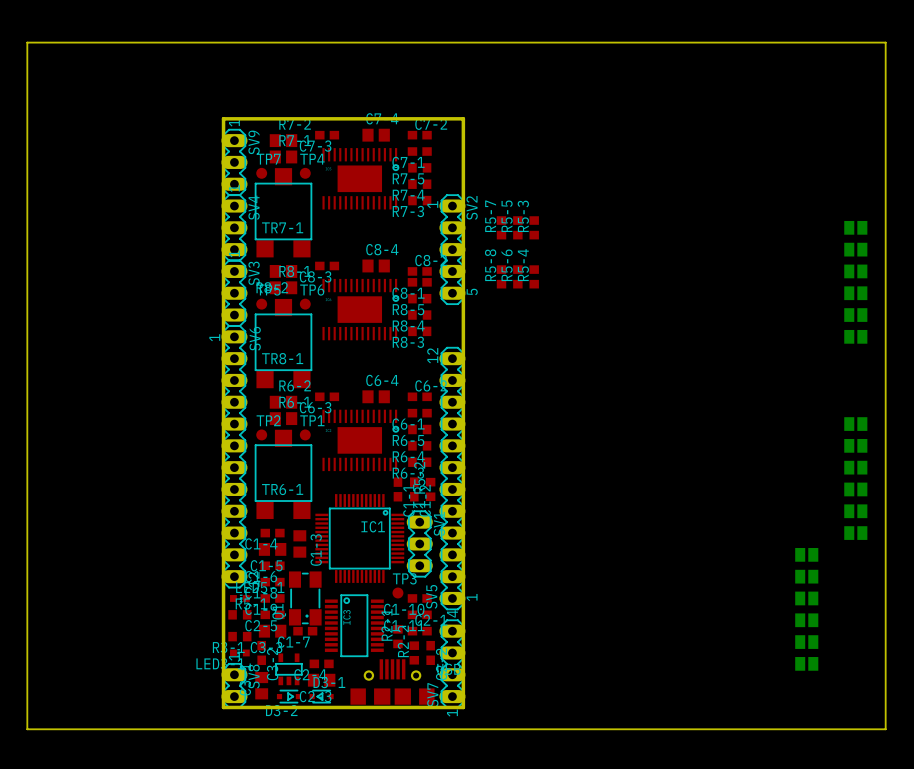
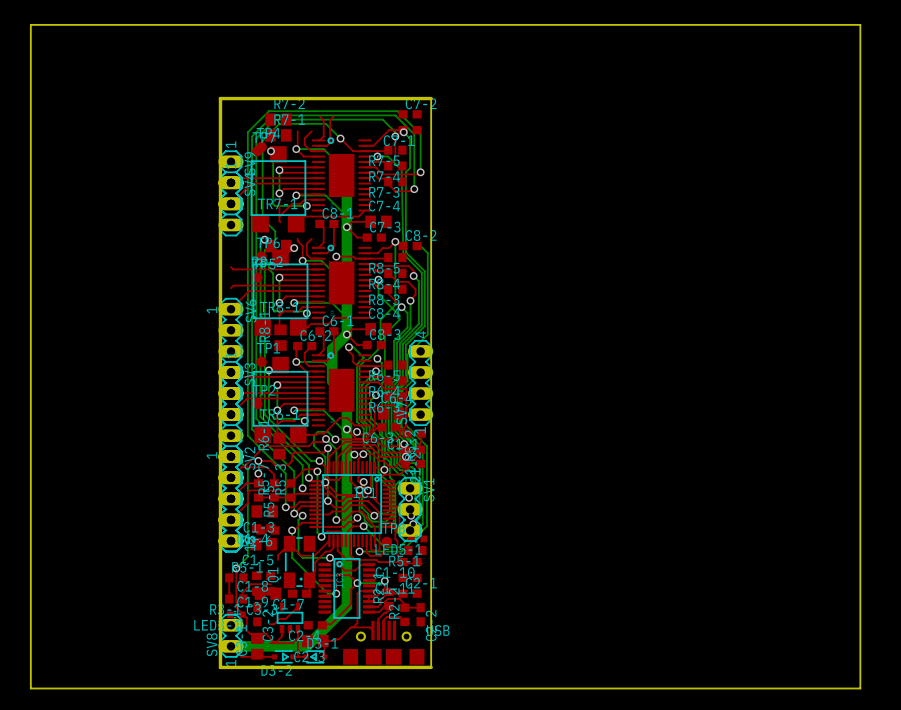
board edge: (441, 118) (463, 118) (463, 707) (441, 707) -> (431, 98) (431, 667)
C7-3 position: (327, 135) -> (374, 237)
C7-4 position: (376, 135) -> (378, 221)
top track: none -> (319, 116) (323, 120) (323, 136) (318, 140)
top track: none -> (333, 116) (330, 120) (330, 142) (327, 145) (318, 145)
C7-3 name position: C7-3 (315, 146) -> C7-3 (385, 227)
top track: none -> (297, 131) (296, 149) (303, 156) (318, 156)
top track: none -> (311, 131) (304, 138) (304, 144) (311, 151) (318, 151)
top track: none -> (403, 132) (401, 130) (389, 130) (373, 145) (364, 145)
bottom track: none -> (403, 132) (410, 138) (410, 168) (405, 172) (405, 252) (424, 271) (424, 326) (405, 345) (405, 380) (397, 389) (397, 429) (414, 446) (405, 456)
via: none -> (403, 132)
top track: none -> (395, 136) (395, 158) (388, 165) (384, 161) (364, 161)
bottom track: none -> (395, 136) (395, 132) (382, 119) (275, 119) (256, 138) (256, 418) (302, 465) (302, 488)
via: none -> (395, 136)
top track: none -> (340, 138) (353, 151) (388, 150)
bottom track: none -> (340, 138) (325, 123) (279, 123) (262, 140) (262, 218) (275, 231) (275, 239) (264, 250) (264, 414) (311, 460) (319, 460)
via: none -> (340, 138)
SV9 position: (234, 162) -> (231, 182)
R7-5 position: (419, 167) -> (395, 150)
bottom track: none -> (296, 149) (323, 149) (346, 172) (346, 334) (332, 349) (332, 380) (346, 395) (346, 606) (306, 646) (231, 646)
via: none -> (296, 149)
bottom track: none -> (271, 151) (273, 153) (273, 203) (275, 206) (306, 206)
via: none -> (271, 151)
TP4 position: (305, 173) -> (261, 147)
part rotation: 0° (360, 178) -> 90° counterclockwise (341, 174)
bottom track: none -> (377, 156) (387, 156) (401, 170) (403, 253) (421, 272) (421, 325) (402, 344) (402, 380) (394, 388) (394, 430) (404, 440) (404, 444)
via: none -> (377, 156)
R7-4 position: (419, 184) -> (395, 165)
top track: none -> (318, 167) (282, 167) (279, 170) (282, 172) (318, 172)
top track: none -> (364, 167) (375, 167) (382, 174) (418, 174) (420, 172)
bottom track: none -> (279, 170) (279, 193)
via: none -> (279, 170)
top track: none -> (364, 172) (372, 172) (378, 178) (385, 178) (395, 191) (412, 191) (414, 189)
bottom track: none -> (420, 172) (420, 134) (397, 111) (268, 111) (247, 132) (247, 435) (285, 473) (285, 507)
via: none -> (420, 172)
R7-3 position: (419, 200) -> (395, 181)
top track: none -> (318, 178) (235, 178) (231, 182)
top track: none -> (318, 183) (251, 183) (231, 203)
top track: none -> (318, 188) (283, 188) (279, 193) (280, 222)
bottom track: none -> (414, 189) (414, 134) (395, 115) (273, 115) (252, 136) (252, 429) (294, 471) (294, 513)
via: none -> (414, 189)
via: none -> (279, 193)
R5-5 name position: R5-5 (507, 216) -> R5-5 (269, 501)
top track: none -> (318, 194) (296, 195)
bottom track: none -> (296, 195) (325, 195) (346, 216)
via: none -> (296, 195)
top track: none -> (318, 199) (304, 199) (300, 203) (292, 203) (279, 216)
R5-7 position: (501, 227) -> (274, 490)
R5-5 position: (517, 227) -> (258, 490)
R5-3 position: (534, 227) -> (291, 490)
part: (855, 227) -> none
via: none -> (306, 206)
top track: none -> (364, 210) (358, 216) (301, 216) (298, 219)
top track: none -> (370, 221) (352, 221) (346, 227) (357, 237) (367, 237)
top track: none -> (319, 223) (323, 227) (323, 242) (318, 247)
top track: none -> (333, 223) (333, 246) (327, 253) (318, 253)
SV2 position: (452, 249) -> (231, 498)
part: (855, 249) -> none
via: none -> (346, 227)
top track: none -> (297, 238) (302, 246) (302, 260) (305, 264) (318, 264)
top track: none -> (311, 238) (306, 243) (306, 254) (311, 258) (318, 258)
bottom track: none -> (264, 239) (260, 243) (260, 416) (308, 465) (308, 477)
via: none -> (264, 239)
C8-3 position: (327, 265) -> (374, 345)
C8-4 position: (376, 265) -> (378, 329)
top track: none -> (395, 241) (389, 248) (382, 248) (377, 253) (364, 253)
bottom track: none -> (395, 241) (395, 305) (380, 319) (380, 347) (359, 366) (359, 419) (366, 426) (366, 442) (374, 450) (374, 472) (389, 488) (389, 510) (386, 513) (376, 513) (374, 515)
via: none -> (395, 241)
R8-1 name position: R8-1 (295, 271) -> R8-1 (264, 326)
bottom track: none -> (420, 246) (427, 253) (427, 334) (407, 354) (407, 381) (399, 388) (399, 429) (416, 445) (416, 453) (412, 457)
part: (855, 271) -> none
via: none -> (294, 248)
C8-3 name position: C8-3 (315, 276) -> C8-3 (385, 334)
R5-8: (501, 276) -> none
R5-6: (517, 276) -> none
R5-4: (534, 276) -> none
top track: none -> (336, 256) (353, 256) (355, 258) (388, 257)
via: none -> (336, 256)
C8-1 position: (419, 282) -> (326, 223)
bottom track: none -> (302, 260) (321, 260) (346, 286)
via: none -> (302, 260)
R8-1 rotation: 0° (283, 287) -> 90° clockwise (280, 337)
R8-1 position: (283, 287) -> (280, 337)
bottom track: none -> (268, 262) (268, 269) (273, 273) (273, 309) (275, 311) (304, 311) (306, 313)
top track: none -> (364, 264) (408, 266) (413, 270) (413, 275)
top track: none -> (231, 267) (233, 269) (318, 269)
SV3 position: (234, 293) -> (231, 393)
C8-1 name position: C8-1 (408, 293) -> C8-1 (338, 213)
part: (855, 293) -> none
top track: none -> (364, 269) (386, 271) (397, 281) (407, 281) (415, 289) (415, 294) (410, 300)
R8-5 position: (419, 298) -> (395, 257)
top track: none -> (318, 274) (282, 274) (279, 277) (282, 280) (318, 280)
bottom track: none -> (413, 275) (418, 281) (418, 323) (399, 343) (399, 379) (391, 387) (391, 431) (397, 438) (400, 461) (414, 463) (419, 468) (419, 517) (413, 524)
via: none -> (413, 275)
bottom track: none -> (279, 277) (279, 302)
via: none -> (279, 277)
TP6 position: (305, 304) -> (261, 256)
top track: none -> (364, 280) (370, 280) (378, 288) (387, 288) (388, 293) (401, 307)
bottom track: none -> (378, 279) (378, 294) (399, 315) (399, 319) (384, 334) (382, 436) (385, 439) (385, 451) (391, 458) (391, 466) (399, 474) (402, 474) (405, 477) (405, 483) (401, 487) (401, 490) (409, 497)
via: none -> (378, 279)
part rotation: 0° (360, 309) -> 90° counterclockwise (341, 281)
top track: none -> (318, 285) (233, 285) (231, 288)
R8-4 position: (419, 315) -> (395, 273)
part: (855, 315) -> none
top track: none -> (318, 290) (249, 290) (231, 309)
top track: none -> (318, 296) (286, 296) (279, 302) (280, 329)
bottom track: none -> (410, 300) (410, 328) (397, 342) (397, 378) (388, 386) (388, 433) (391, 436) (391, 449) (397, 454) (397, 463) (401, 467) (412, 467) (415, 470) (415, 511) (411, 515)
via: none -> (410, 300)
top track: none -> (318, 301) (294, 302)
via: none -> (279, 302)
bottom track: none -> (294, 302) (332, 302) (346, 317)
via: none -> (294, 302)
R8-3 position: (419, 331) -> (395, 289)
top track: none -> (318, 307) (302, 307) (298, 311) (283, 311) (279, 315)
bottom track: none -> (401, 307) (407, 313) (407, 327) (394, 341) (394, 376) (385, 385) (385, 435) (388, 437) (388, 449) (394, 456) (394, 464) (400, 470) (409, 470) (412, 473) (412, 484) (409, 488)
via: none -> (401, 307)
part: (855, 336) -> none
via: none -> (306, 313)
TR8-1 position: (283, 343) -> (280, 292)
top track: none -> (364, 317) (334, 317) (328, 323) (311, 323) (307, 327) (298, 327)
top track: none -> (370, 329) (352, 329) (346, 334) (357, 345) (367, 345)
top track: none -> (319, 331) (323, 335) (323, 349) (318, 355)
top track: none -> (333, 331) (333, 353) (327, 360) (318, 360)
via: none -> (346, 334)
top track: none -> (297, 346) (296, 361) (305, 371) (318, 371)
top track: none -> (311, 346) (304, 353) (304, 361) (308, 366) (318, 366)
top track: none -> (348, 347) (348, 351) (353, 355) (353, 361) (357, 366) (388, 365)
bottom track: none -> (348, 347) (353, 347) (363, 357) (356, 364) (356, 421) (363, 428) (363, 446) (370, 452) (372, 486) (367, 490)
via: none -> (348, 347)
bottom track: none -> (377, 358) (381, 363) (381, 374) (365, 386) (365, 417) (373, 425) (373, 432) (382, 441) (384, 469)
via: none -> (377, 358)
bottom track: none -> (296, 361) (323, 361) (332, 370)
via: none -> (296, 361)
C6-3 position: (327, 396) -> (389, 427)
C6-4 position: (376, 396) -> (391, 413)
C6-2 position: (419, 396) -> (304, 346)
bottom track: none -> (268, 370) (268, 412) (275, 418) (302, 418) (304, 420)
via: none -> (268, 370)
bottom track: none -> (375, 371) (362, 385) (362, 419) (369, 426) (369, 434) (378, 443) (378, 472) (392, 486) (392, 515) (386, 521) (372, 521) (362, 507) (362, 483) (363, 482)
via: none -> (375, 371)
top track: none -> (231, 372) (235, 376) (318, 376)
R6-2: (283, 402) -> none
R6-1 name position: R6-1 (295, 402) -> R6-1 (263, 434)
bottom track: none -> (420, 372) (401, 391) (401, 427) (422, 448) (422, 524) (399, 547) (384, 547) (363, 526)
top track: none -> (364, 376) (384, 376) (396, 388) (406, 388) (406, 425) (396, 439) (335, 439)
top track: none -> (318, 382) (280, 382) (277, 385) (279, 387) (318, 387)
top track: none -> (364, 382) (378, 382) (384, 388) (393, 388) (394, 404) (375, 405) (374, 426) (367, 434) (359, 434) (356, 431)
C6-1 position: (419, 413) -> (326, 331)
bottom track: none -> (277, 385) (277, 410)
via: none -> (277, 385)
R6-1 rotation: 0° (283, 418) -> 90° clockwise (279, 446)
R6-1 position: (283, 418) -> (279, 446)
top track: none -> (318, 393) (231, 393)
C6-1 name position: C6-1 (408, 424) -> C6-1 (338, 320)
bottom track: none -> (420, 393) (405, 408) (405, 425) (426, 446) (426, 526) (401, 551) (359, 551)
part: (855, 424) -> none
bottom track: none -> (375, 395) (370, 400) (370, 417) (379, 426) (379, 434) (384, 439) (384, 457) (389, 462) (389, 477) (393, 481) (393, 522) (389, 526) (370, 526) (364, 520) (364, 516) (359, 511) (359, 490)
via: none -> (375, 395)
top track: none -> (318, 398) (247, 398) (231, 414)
R6-5 position: (419, 429) -> (395, 365)
TP1 position: (305, 434) -> (261, 361)
top track: none -> (318, 403) (283, 403) (277, 410) (277, 431) (279, 438)
top track: none -> (318, 409) (294, 410)
part rotation: 0° (360, 440) -> 90° counterclockwise (341, 389)
via: none -> (277, 410)
bottom track: none -> (294, 410) (323, 410) (346, 433)
via: none -> (294, 410)
top track: none -> (318, 414) (300, 414) (294, 420) (281, 420) (277, 425)
R6-4 position: (419, 445) -> (395, 380)
part: (855, 445) -> none
via: none -> (304, 420)
top track: none -> (364, 425) (354, 425) (347, 417) (339, 417) (324, 433) (298, 434)
top track: none -> (381, 427) (379, 425) (365, 439) (356, 439) (346, 429)
via: none -> (346, 429)
R6-3 position: (419, 462) -> (395, 396)
via: none -> (356, 431)
top track: none -> (421, 433) (419, 453)
part: (855, 467) -> none
top track: none -> (326, 439) (323, 441) (313, 441) (308, 446) (264, 446) (243, 467)
bottom track: none -> (326, 439) (336, 449) (336, 519)
via: none -> (326, 439)
bottom track: none -> (335, 439) (327, 431) (317, 431) (314, 435) (314, 445) (325, 457) (325, 482)
via: none -> (335, 439)
TR6-1 position: (283, 474) -> (280, 400)
top track: none -> (404, 444) (402, 446) (382, 446) (378, 441) (344, 441) (329, 456) (329, 467)
via: none -> (404, 444)
SV5: (452, 478) -> none
top track: none -> (327, 448) (323, 452) (294, 452) (292, 454) (292, 460) (287, 465) (275, 465) (271, 460) (258, 460)
bottom track: none -> (327, 448) (327, 500)
via: none -> (327, 448)
via: none -> (363, 454)
top track: none -> (419, 453) (406, 466) (409, 467) (399, 474) (384, 474) (376, 482) (376, 500)
top track: none -> (419, 453) (416, 450) (382, 452) (375, 444) (349, 444) (337, 457) (337, 467)
via: none -> (354, 454)
bottom track: none -> (231, 456) (235, 456) (247, 469) (247, 556) (236, 568)
C1-1 rotation: 0° (397, 489) -> 90° clockwise (414, 433)
C1-1 position: (397, 489) -> (414, 433)
top track: none -> (405, 456) (380, 456) (372, 448) (351, 448) (345, 453) (345, 467)
via: none -> (405, 456)
top track: none -> (412, 457) (408, 460) (401, 460) (395, 467)
part: (855, 489) -> none
via: none -> (258, 460)
top track: none -> (319, 460) (325, 467) (325, 475) (330, 479) (338, 479) (341, 476) (341, 467)
via: none -> (319, 460)
top track: none -> (350, 467) (350, 480) (359, 490)
top track: none -> (362, 467) (362, 473) (358, 477) (358, 481) (364, 487) (364, 492) (362, 495) (338, 495) (325, 482)
top track: none -> (370, 467) (370, 487) (367, 490)
top track: none -> (374, 467) (384, 469)
top track: none -> (392, 467) (383, 460) (379, 460) (372, 454) (363, 454) (358, 459) (358, 467)
via: none -> (384, 469)
top track: none -> (317, 471) (315, 469) (304, 469) (284, 490) (249, 490) (247, 492) (247, 503) (231, 519)
bottom track: none -> (317, 471) (317, 532) (321, 536)
via: none -> (317, 471)
top track: none -> (258, 473) (258, 483) (246, 483) (231, 498)
via: none -> (258, 473)
top track: none -> (231, 477) (241, 467) (266, 467) (274, 474) (274, 483)
via: none -> (308, 477)
part: (855, 511) -> none
bottom track: none -> (399, 480) (395, 485) (395, 530) (401, 536)
via: none -> (363, 482)
via: none -> (325, 482)
top track: none -> (315, 485) (322, 485) (338, 500) (342, 500) (346, 496) (372, 496) (381, 506) (396, 506) (399, 509) (399, 526) (395, 530) (397, 555) (405, 563) (421, 563)
via: none -> (302, 488)
via: none -> (359, 490)
via: none -> (367, 490)
top track: none -> (331, 493) (294, 493) (291, 497) (258, 497)
via: none -> (409, 497)
C1-4 position: (272, 533) -> (263, 528)
part: (855, 533) -> none
top track: none -> (327, 500) (334, 507) (342, 507) (348, 500) (367, 500) (379, 512) (378, 550) (370, 549) (370, 540)
via: none -> (327, 500)
top track: none -> (315, 502) (299, 502) (294, 507) (285, 507)
top track: none -> (315, 506) (301, 506) (294, 513)
via: none -> (285, 507)
C1-3 rotation: 0° (299, 543) -> 90° clockwise (264, 511)
C1-3 position: (299, 543) -> (264, 511)
via: none -> (294, 513)
C1-5 position: (272, 549) -> (263, 544)
top track: none -> (315, 514) (344, 511) (351, 505) (363, 505) (374, 515)
bottom track: none -> (302, 515) (298, 519) (298, 553) (302, 557) (330, 557)
via: none -> (302, 515)
via: none -> (374, 515)
via: none -> (411, 515)
top track: none -> (357, 517) (344, 526) (315, 526)
via: none -> (357, 517)
top track: none -> (336, 519) (344, 519) (353, 511) (361, 511) (374, 526) (374, 540)
via: none -> (336, 519)
part: (806, 554) -> none
top track: none -> (315, 522) (301, 522) (292, 530)
via: none -> (413, 524)
top track: none -> (363, 526) (353, 526) (345, 533) (345, 540)
via: none -> (363, 526)
bottom track: none -> (292, 530) (292, 557) (327, 593) (336, 593)
via: none -> (292, 530)
top track: none -> (321, 536) (326, 531) (339, 531) (341, 533) (341, 540)
via: none -> (321, 536)
top track: none -> (329, 540) (314, 555) (301, 555) (289, 543) (278, 555) (278, 559)
top track: none -> (333, 540) (333, 548) (330, 551) (325, 551) (315, 562) (315, 570) (309, 576) (309, 590) (306, 593)
top track: none -> (337, 540) (337, 550) (346, 559) (404, 562)
top track: none -> (350, 540) (350, 554) (355, 559)
top track: none -> (366, 540) (366, 552) (370, 555) (380, 555) (384, 551) (384, 544) (386, 542)
part: (806, 576) -> none
C1-8 position: (272, 582) -> (263, 575)
R5-1: none -> (415, 550)
via: none -> (359, 551)
TP3 position: (397, 593) -> (386, 542)
top track: none -> (330, 557) (344, 570) (355, 570) (361, 564) (369, 564)
via: none -> (330, 557)
LED5-1 rotation: 0° (239, 598) -> 180° (417, 538)
LED5-1 position: (239, 598) -> (417, 538)
C1-9 position: (272, 598) -> (263, 591)
part: (806, 598) -> none
top track: none -> (236, 568) (236, 607) (246, 617) (246, 630) (249, 633) (265, 633) (275, 643) (282, 636) (282, 629)
via: none -> (236, 568)
top track: none -> (324, 575) (349, 575) (357, 583) (351, 589) (351, 604) (331, 624) (323, 624)
top track: none -> (229, 577) (230, 593)
C2-5: (272, 614) -> none
top track: none -> (324, 580) (333, 580) (336, 583) (336, 593)
top track: none -> (384, 581) (384, 588) (376, 596) (369, 596) (369, 601)
bottom track: none -> (384, 581) (382, 583) (357, 583)
via: none -> (384, 581)
via: none -> (357, 583)
part: (806, 620) -> none
top track: none -> (270, 584) (251, 584) (242, 593)
top track: none -> (369, 591) (360, 591) (357, 593) (357, 623) (353, 627)
via: none -> (336, 593)
top track: none -> (407, 593) (388, 591) (380, 599) (380, 604) (377, 606) (369, 606)
part: (806, 642) -> none
top track: none -> (393, 605) (378, 619) (378, 630)
top track: none -> (297, 606) (285, 618) (279, 618) (274, 624) (269, 624)
top track: none -> (420, 607) (404, 607) (404, 604) (399, 598) (387, 598) (384, 602) (384, 606) (379, 612) (369, 612)
top track: none -> (404, 621) (399, 616) (386, 616) (383, 620) (383, 630)
SV8 footprint: [221, 663, 248, 709] -> [218, 614, 244, 658]
SV7 position: (452, 663) -> (420, 382)
part: (806, 663) -> none
top track: none -> (297, 629) (298, 656)
part position: (288, 669) -> (289, 617)
top track: none -> (372, 630) (369, 627) (351, 627) (339, 639) (323, 641) (324, 656)
SV8 name position: SV8 (254, 676) -> SV8 (212, 644)
top track: none -> (297, 637) (292, 643) (270, 643)
top track: none -> (231, 646) (241, 656) (274, 656)
top track: none -> (292, 656) (306, 656)

